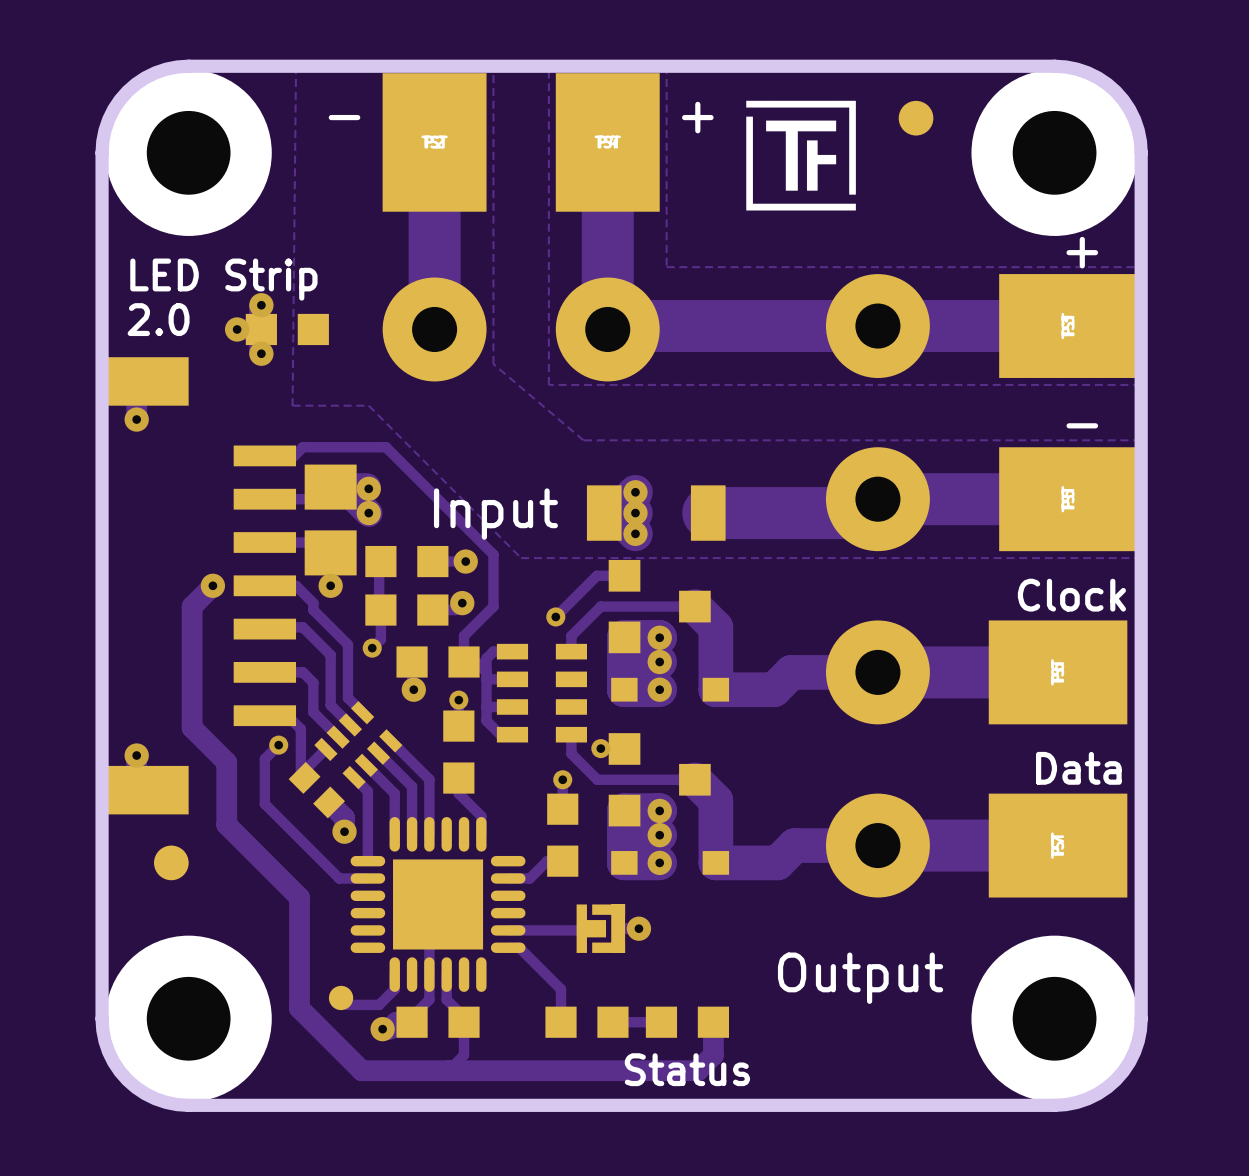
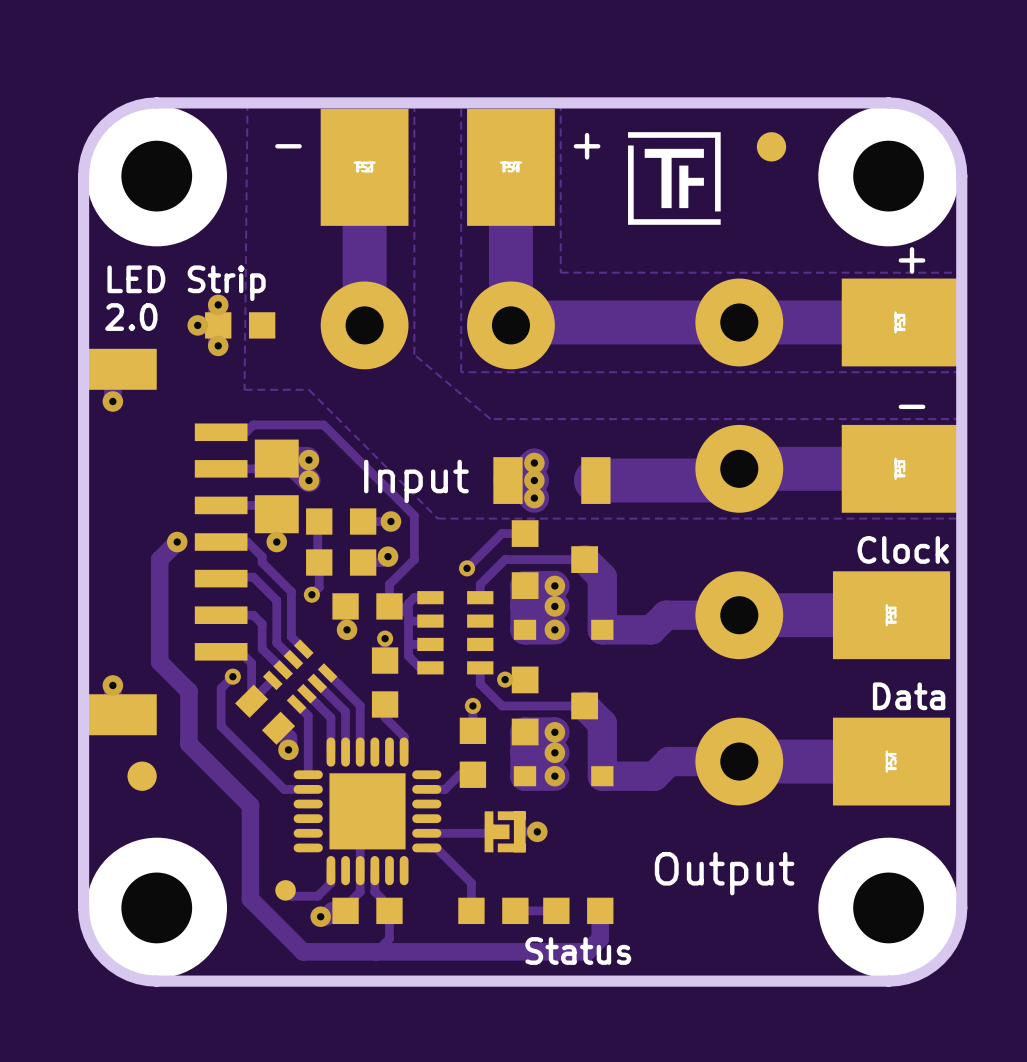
part footprint: [288, 761, 345, 819] -> [235, 684, 296, 745]

